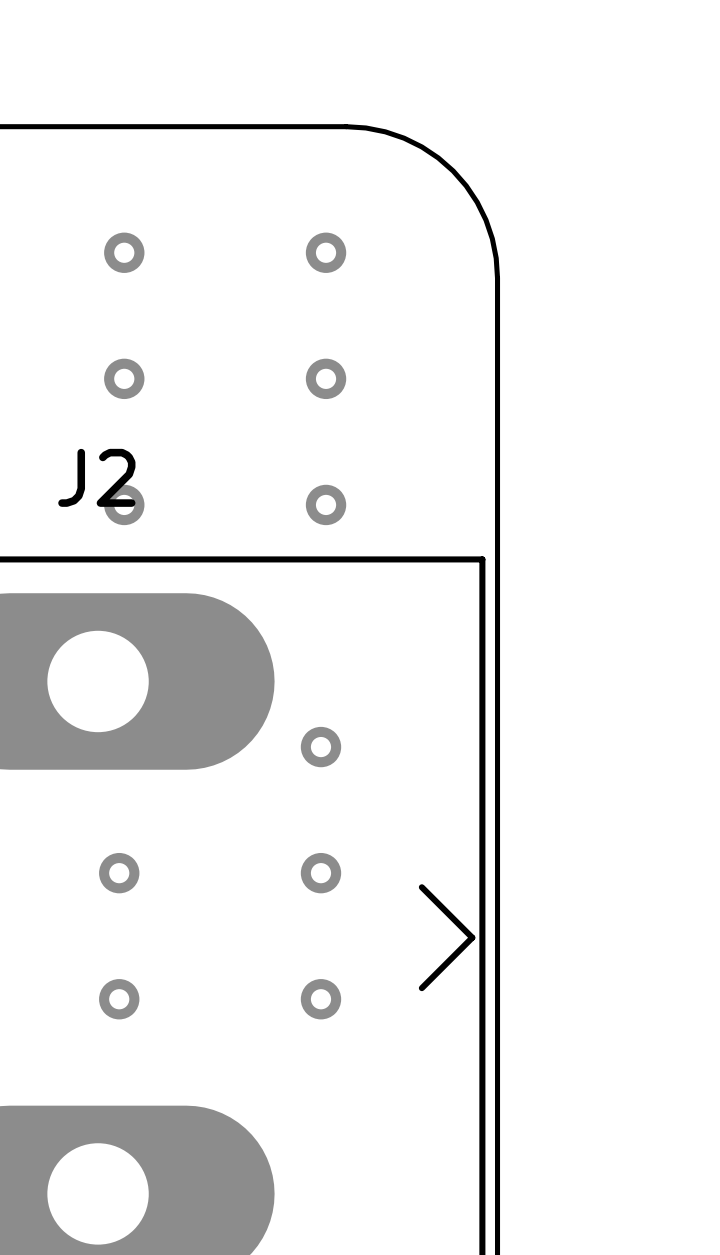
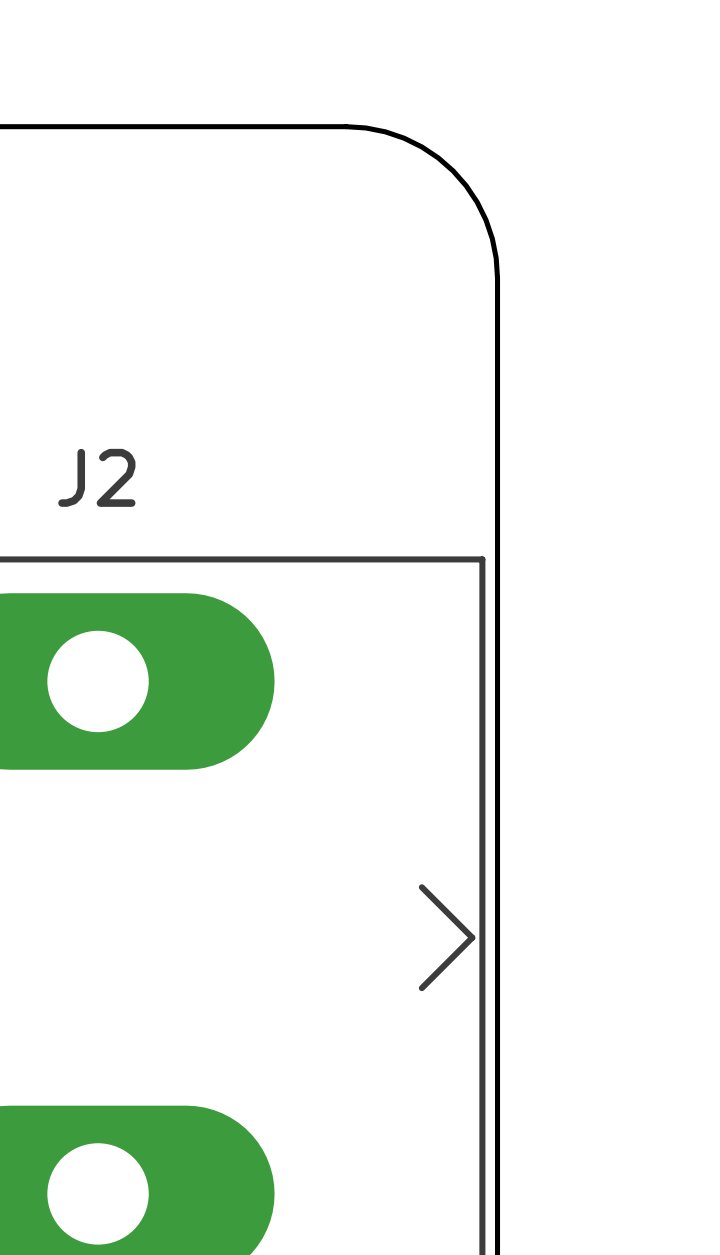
via: (124, 252) -> none
via: (326, 252) -> none
via: (124, 378) -> none
via: (326, 378) -> none
via: (124, 504) -> none
via: (326, 504) -> none
via: (320, 747) -> none
via: (119, 873) -> none
via: (320, 873) -> none
via: (119, 999) -> none
via: (320, 999) -> none

